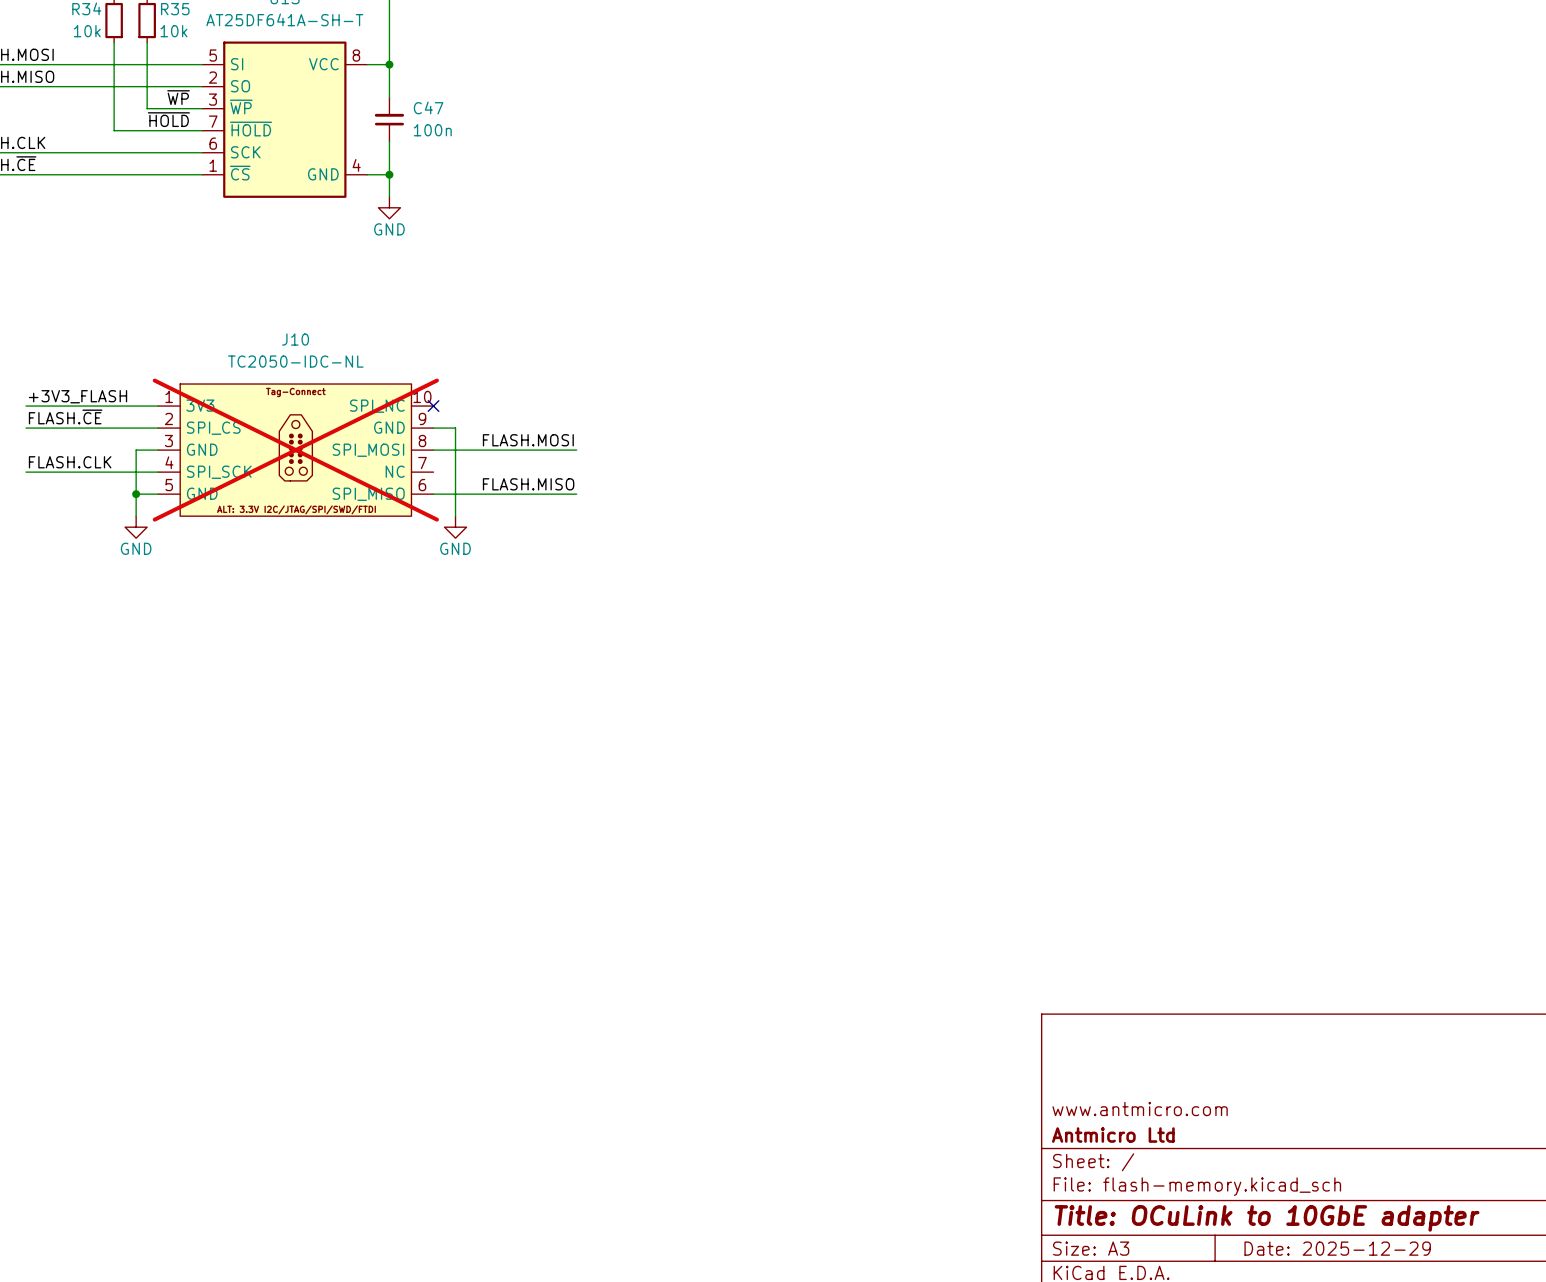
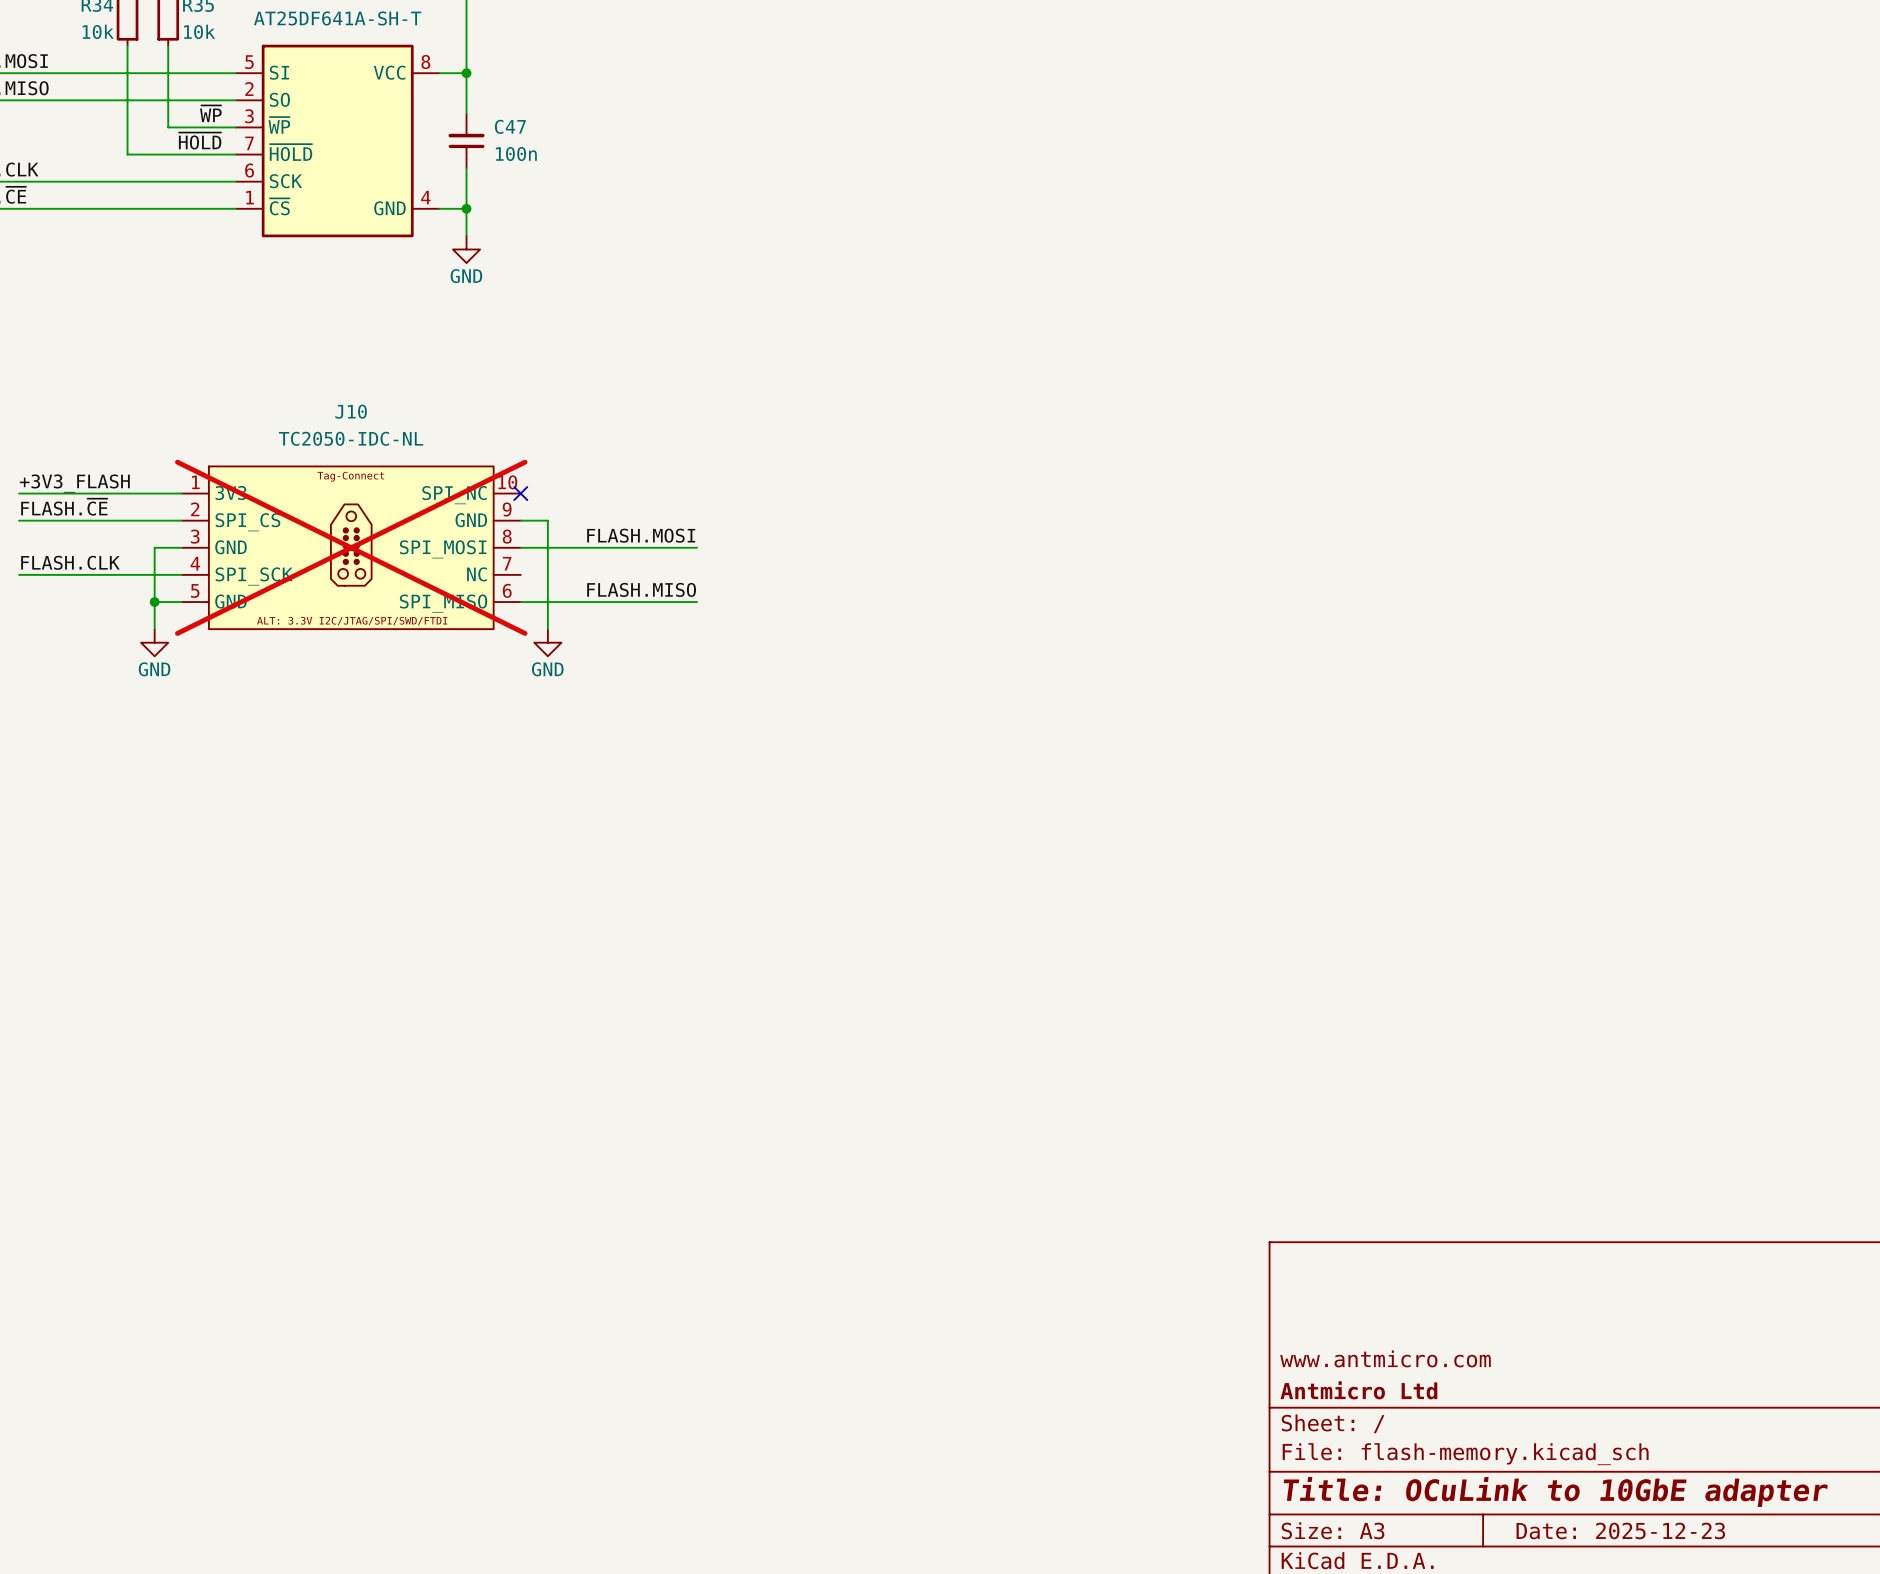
title block: Date: 2025-12-29 (1337, 1248) -> Date: 2025-12-23 (1620, 1530)

